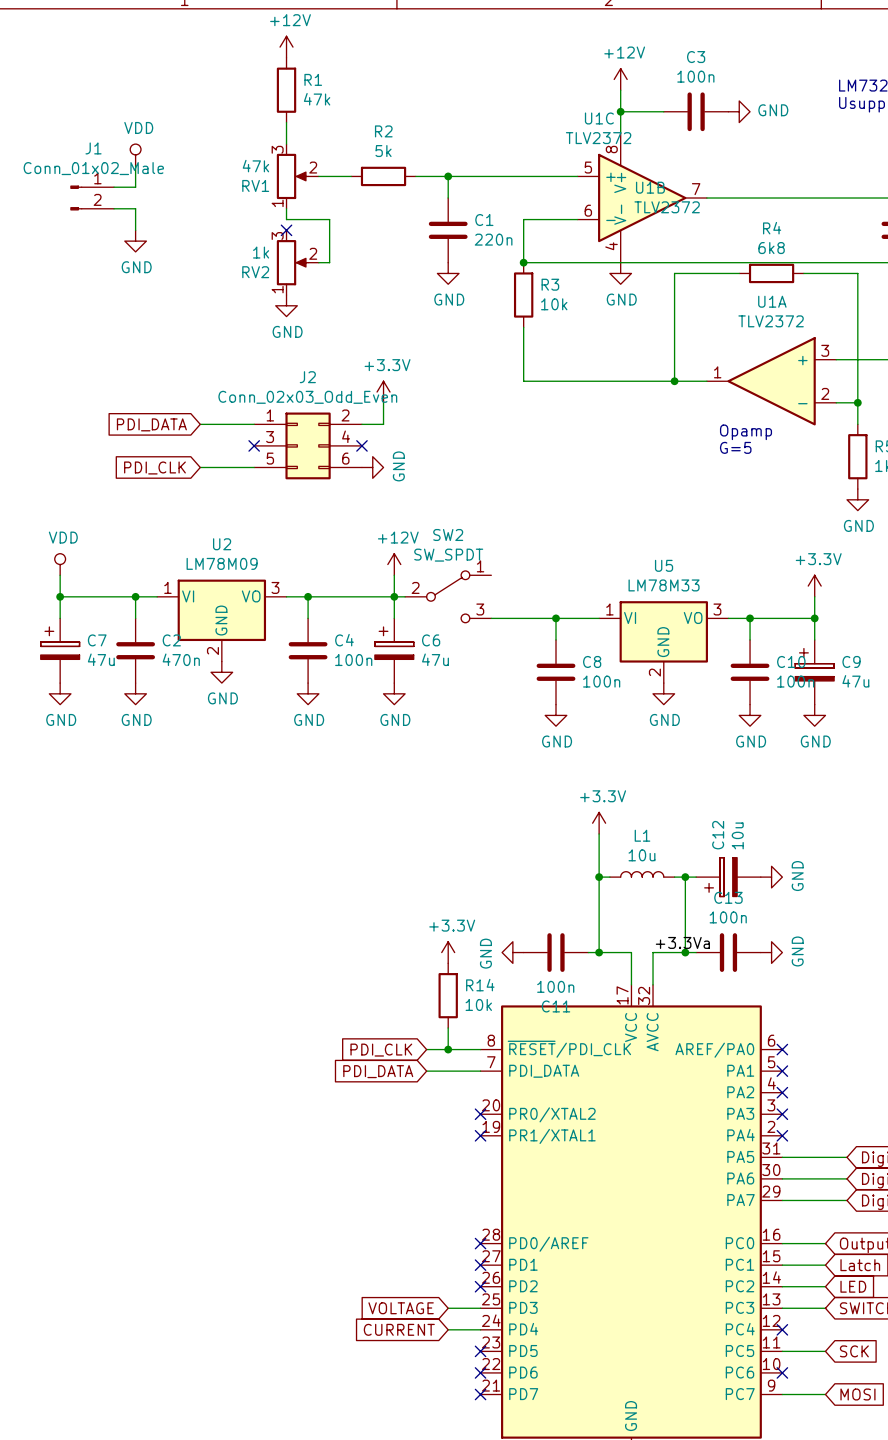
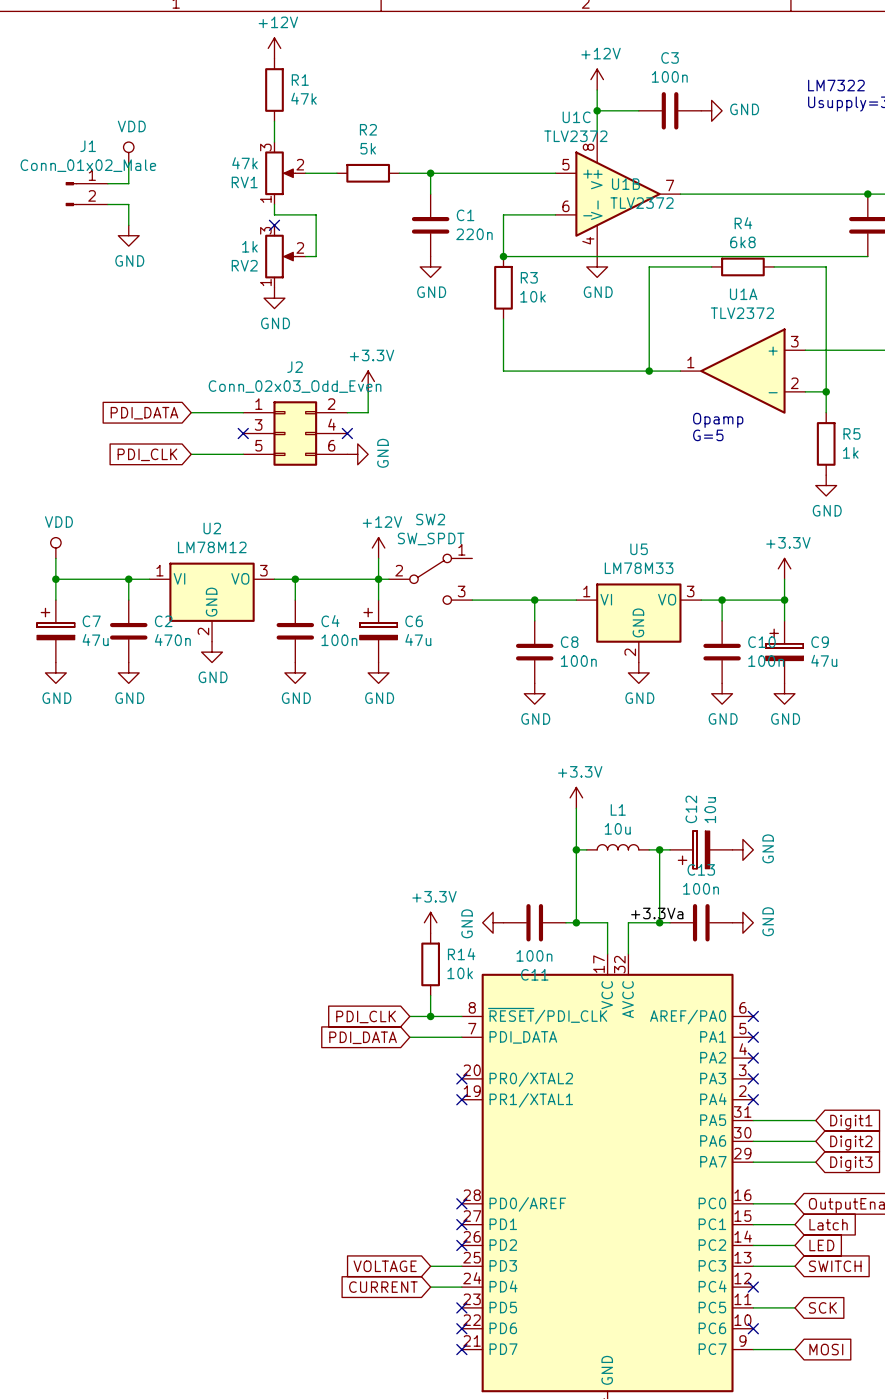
U2 value: LM78M09 (222, 563) -> LM78M12 (212, 547)

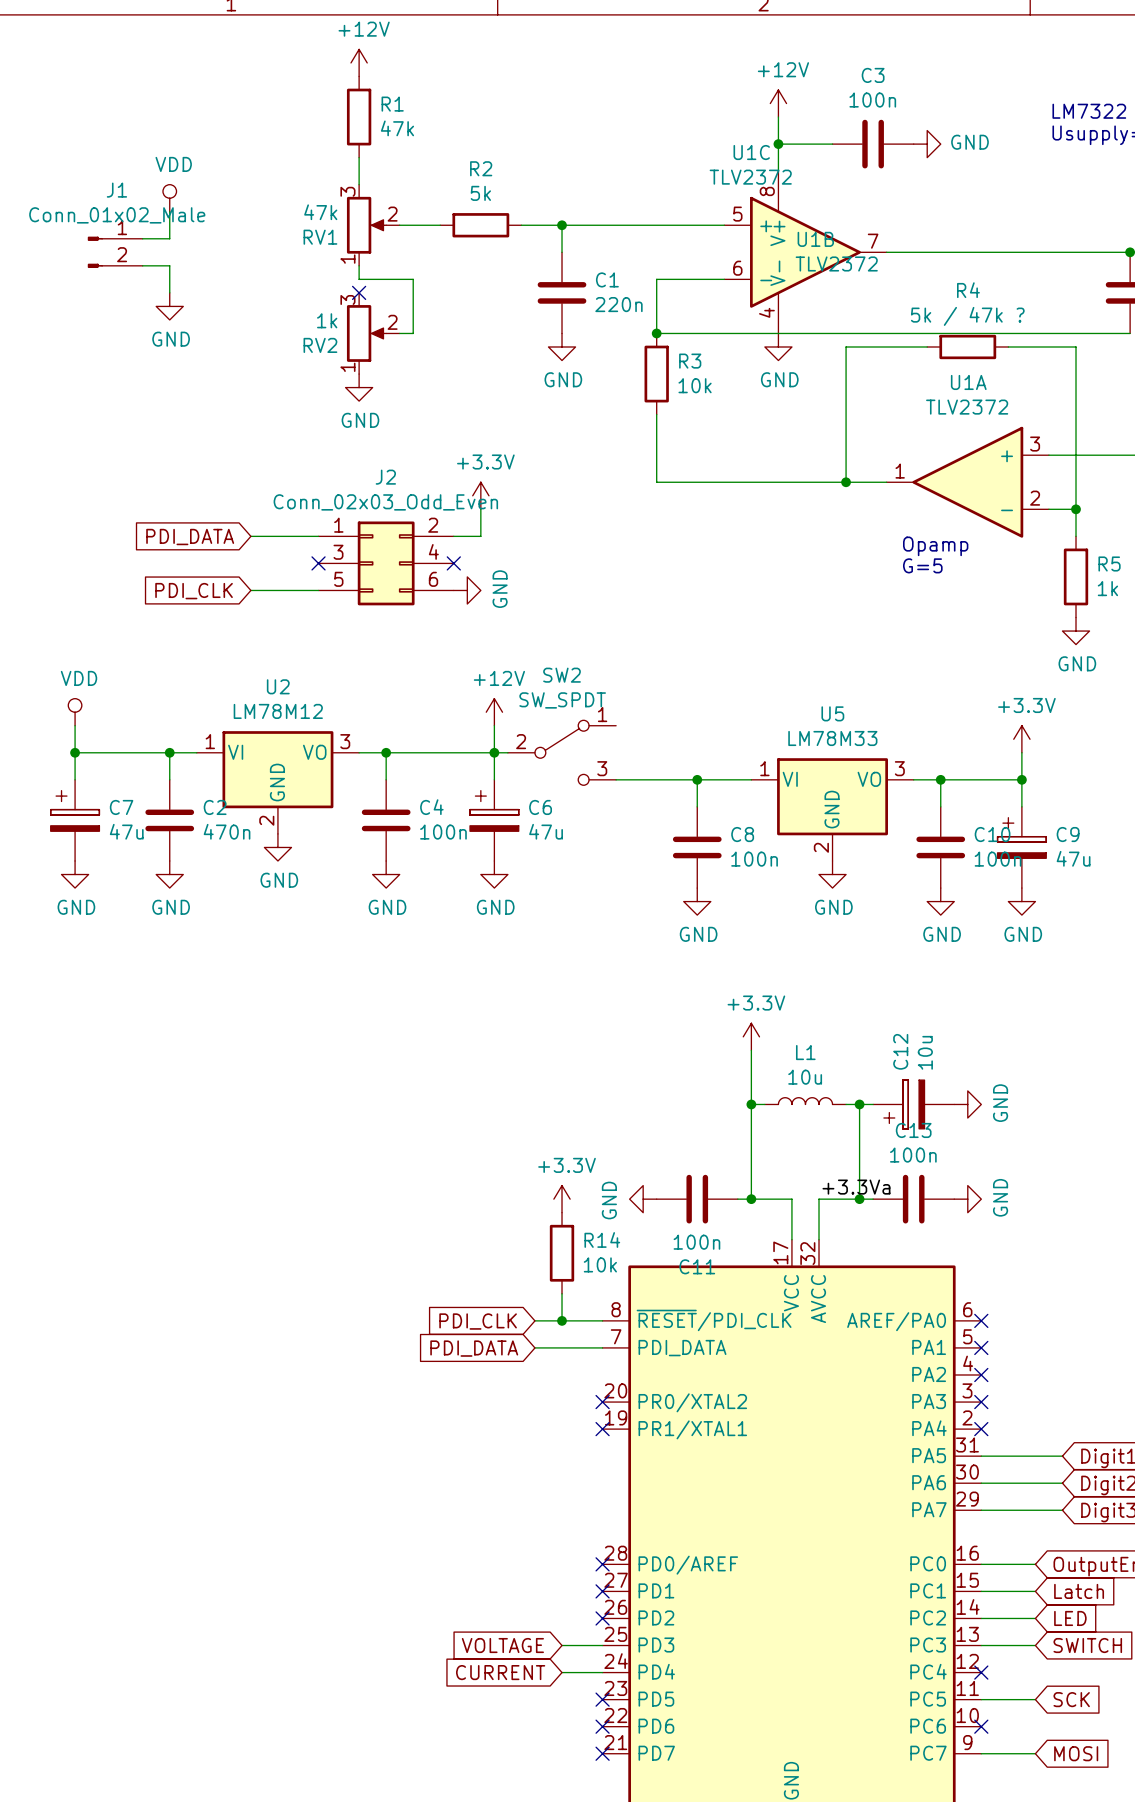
R4 value: 6k8 (742, 242) -> 5k / 47k ? (967, 316)

